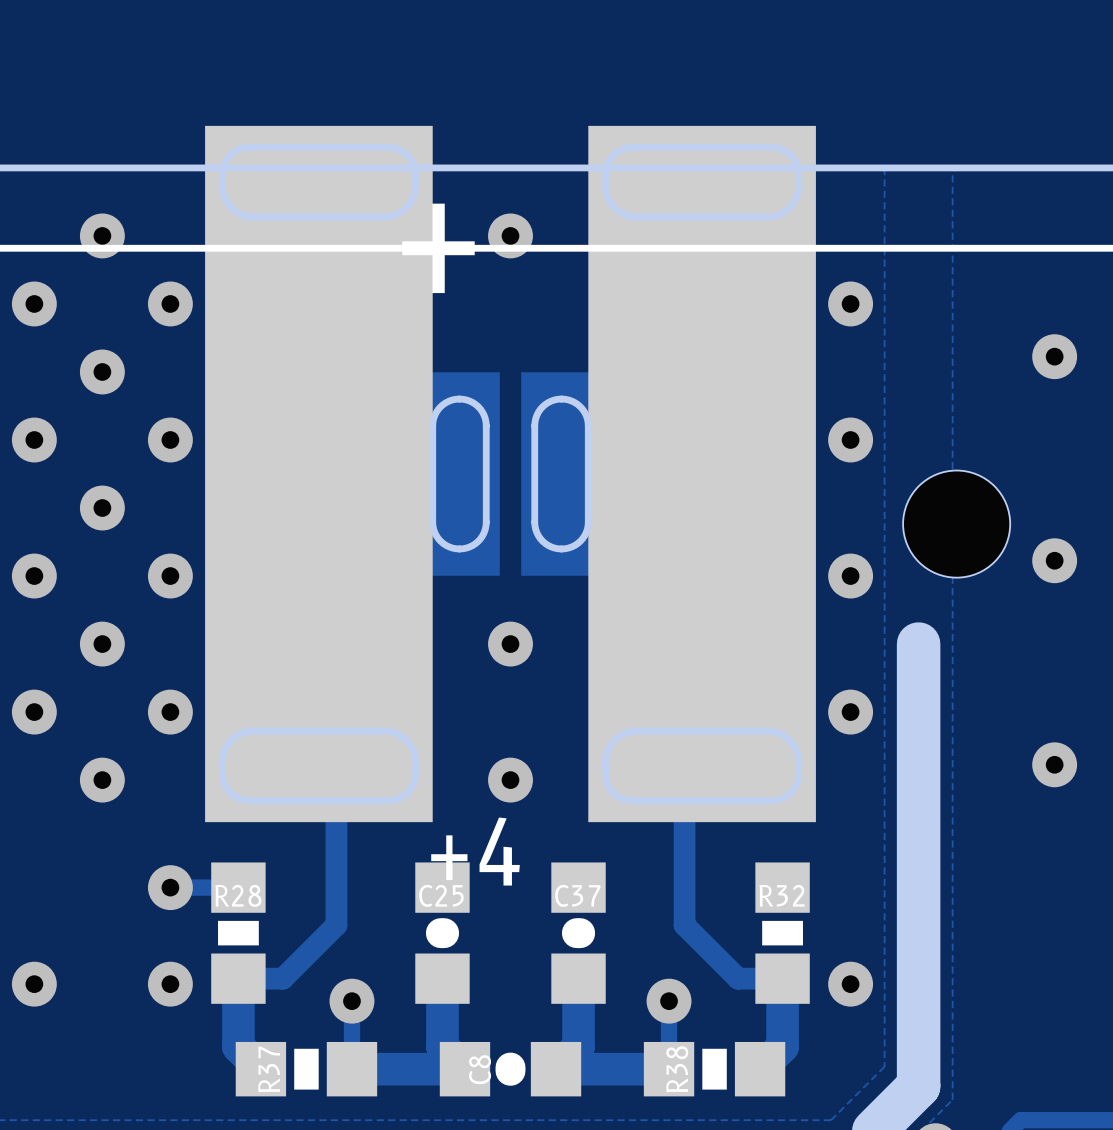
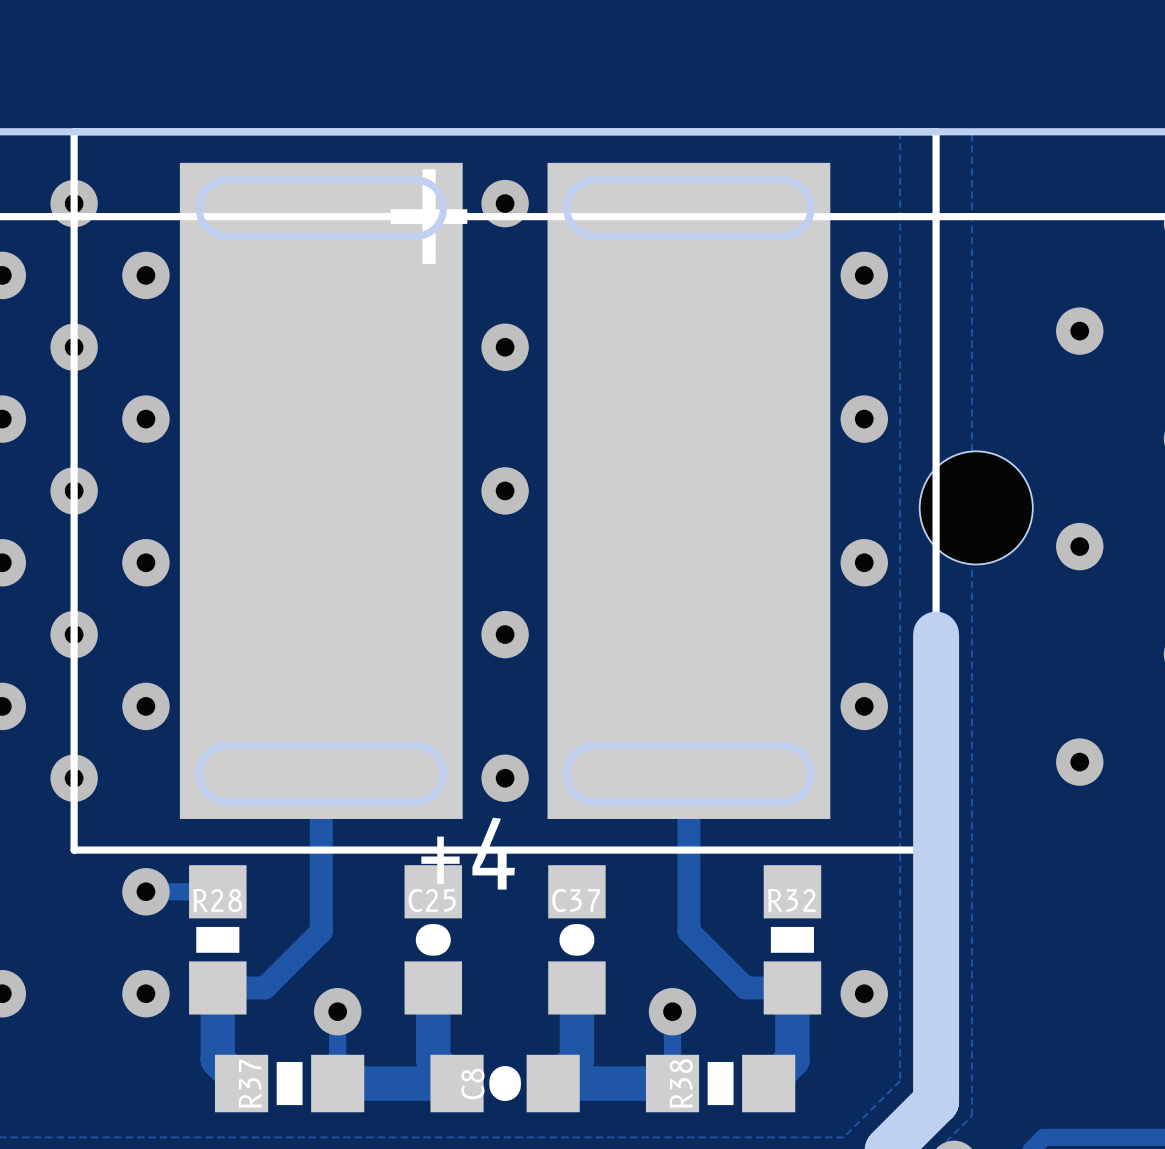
part footprint: [205, 125, 816, 823] -> [70, 128, 940, 854]
via: none -> (505, 347)
via: none -> (505, 490)

